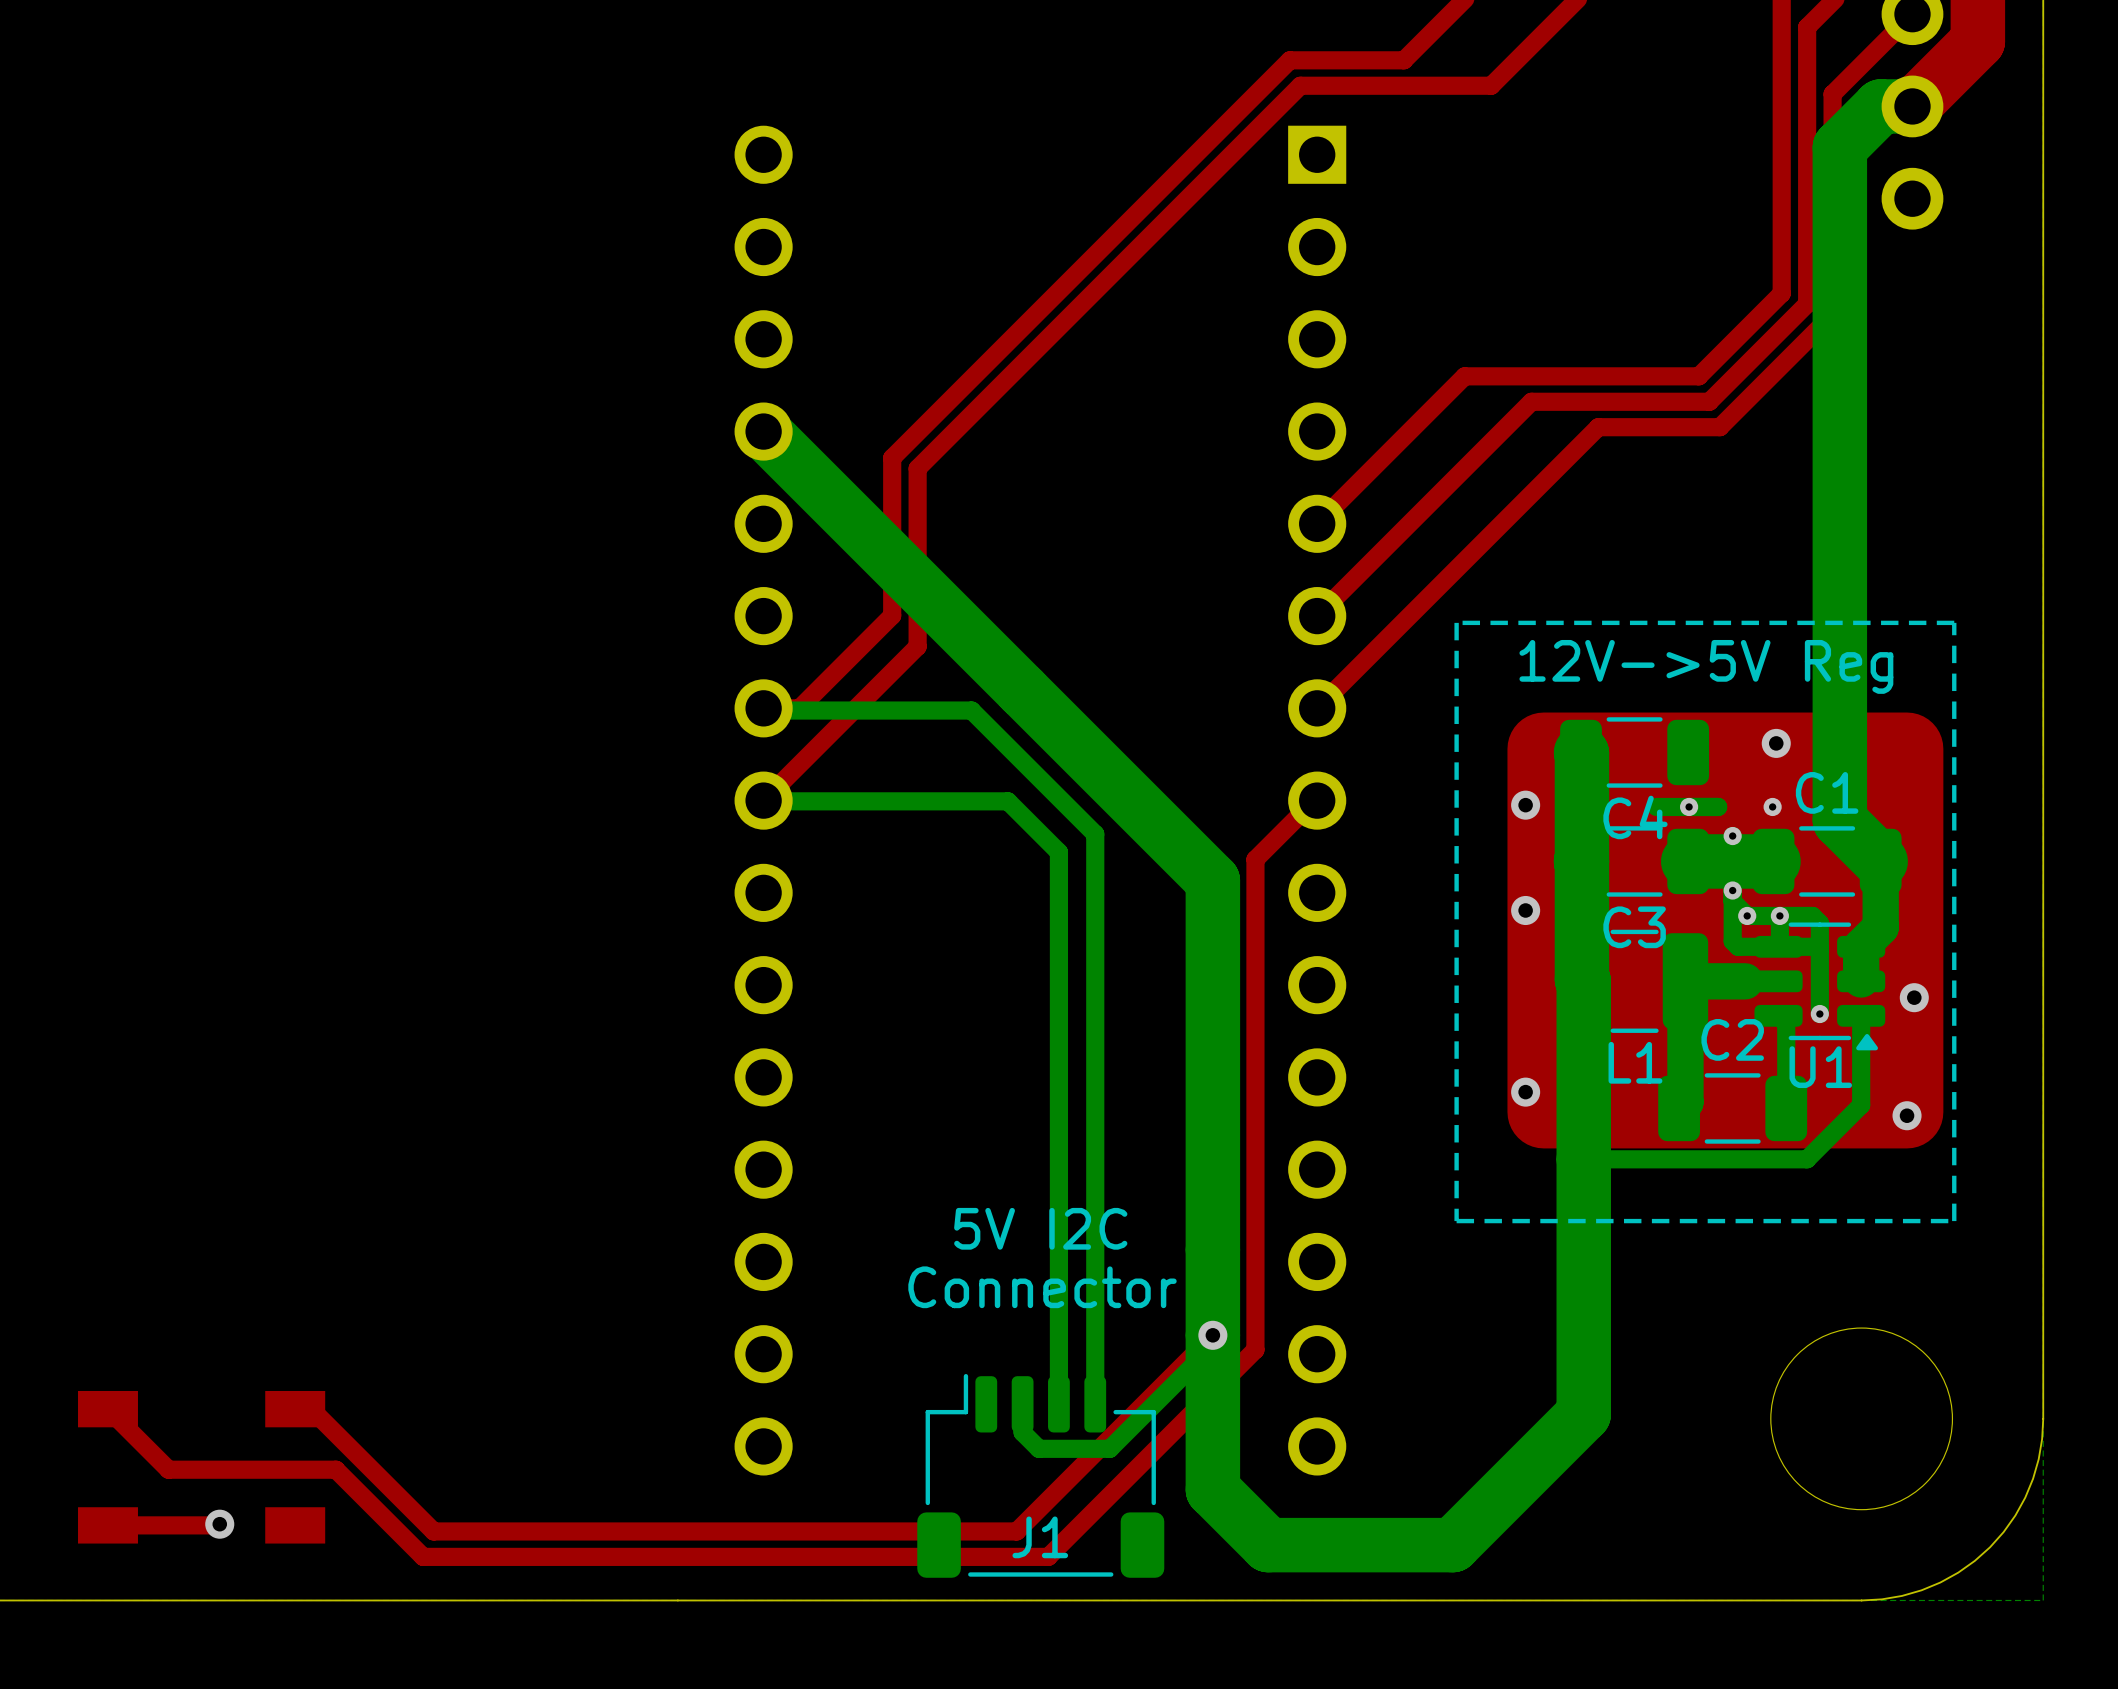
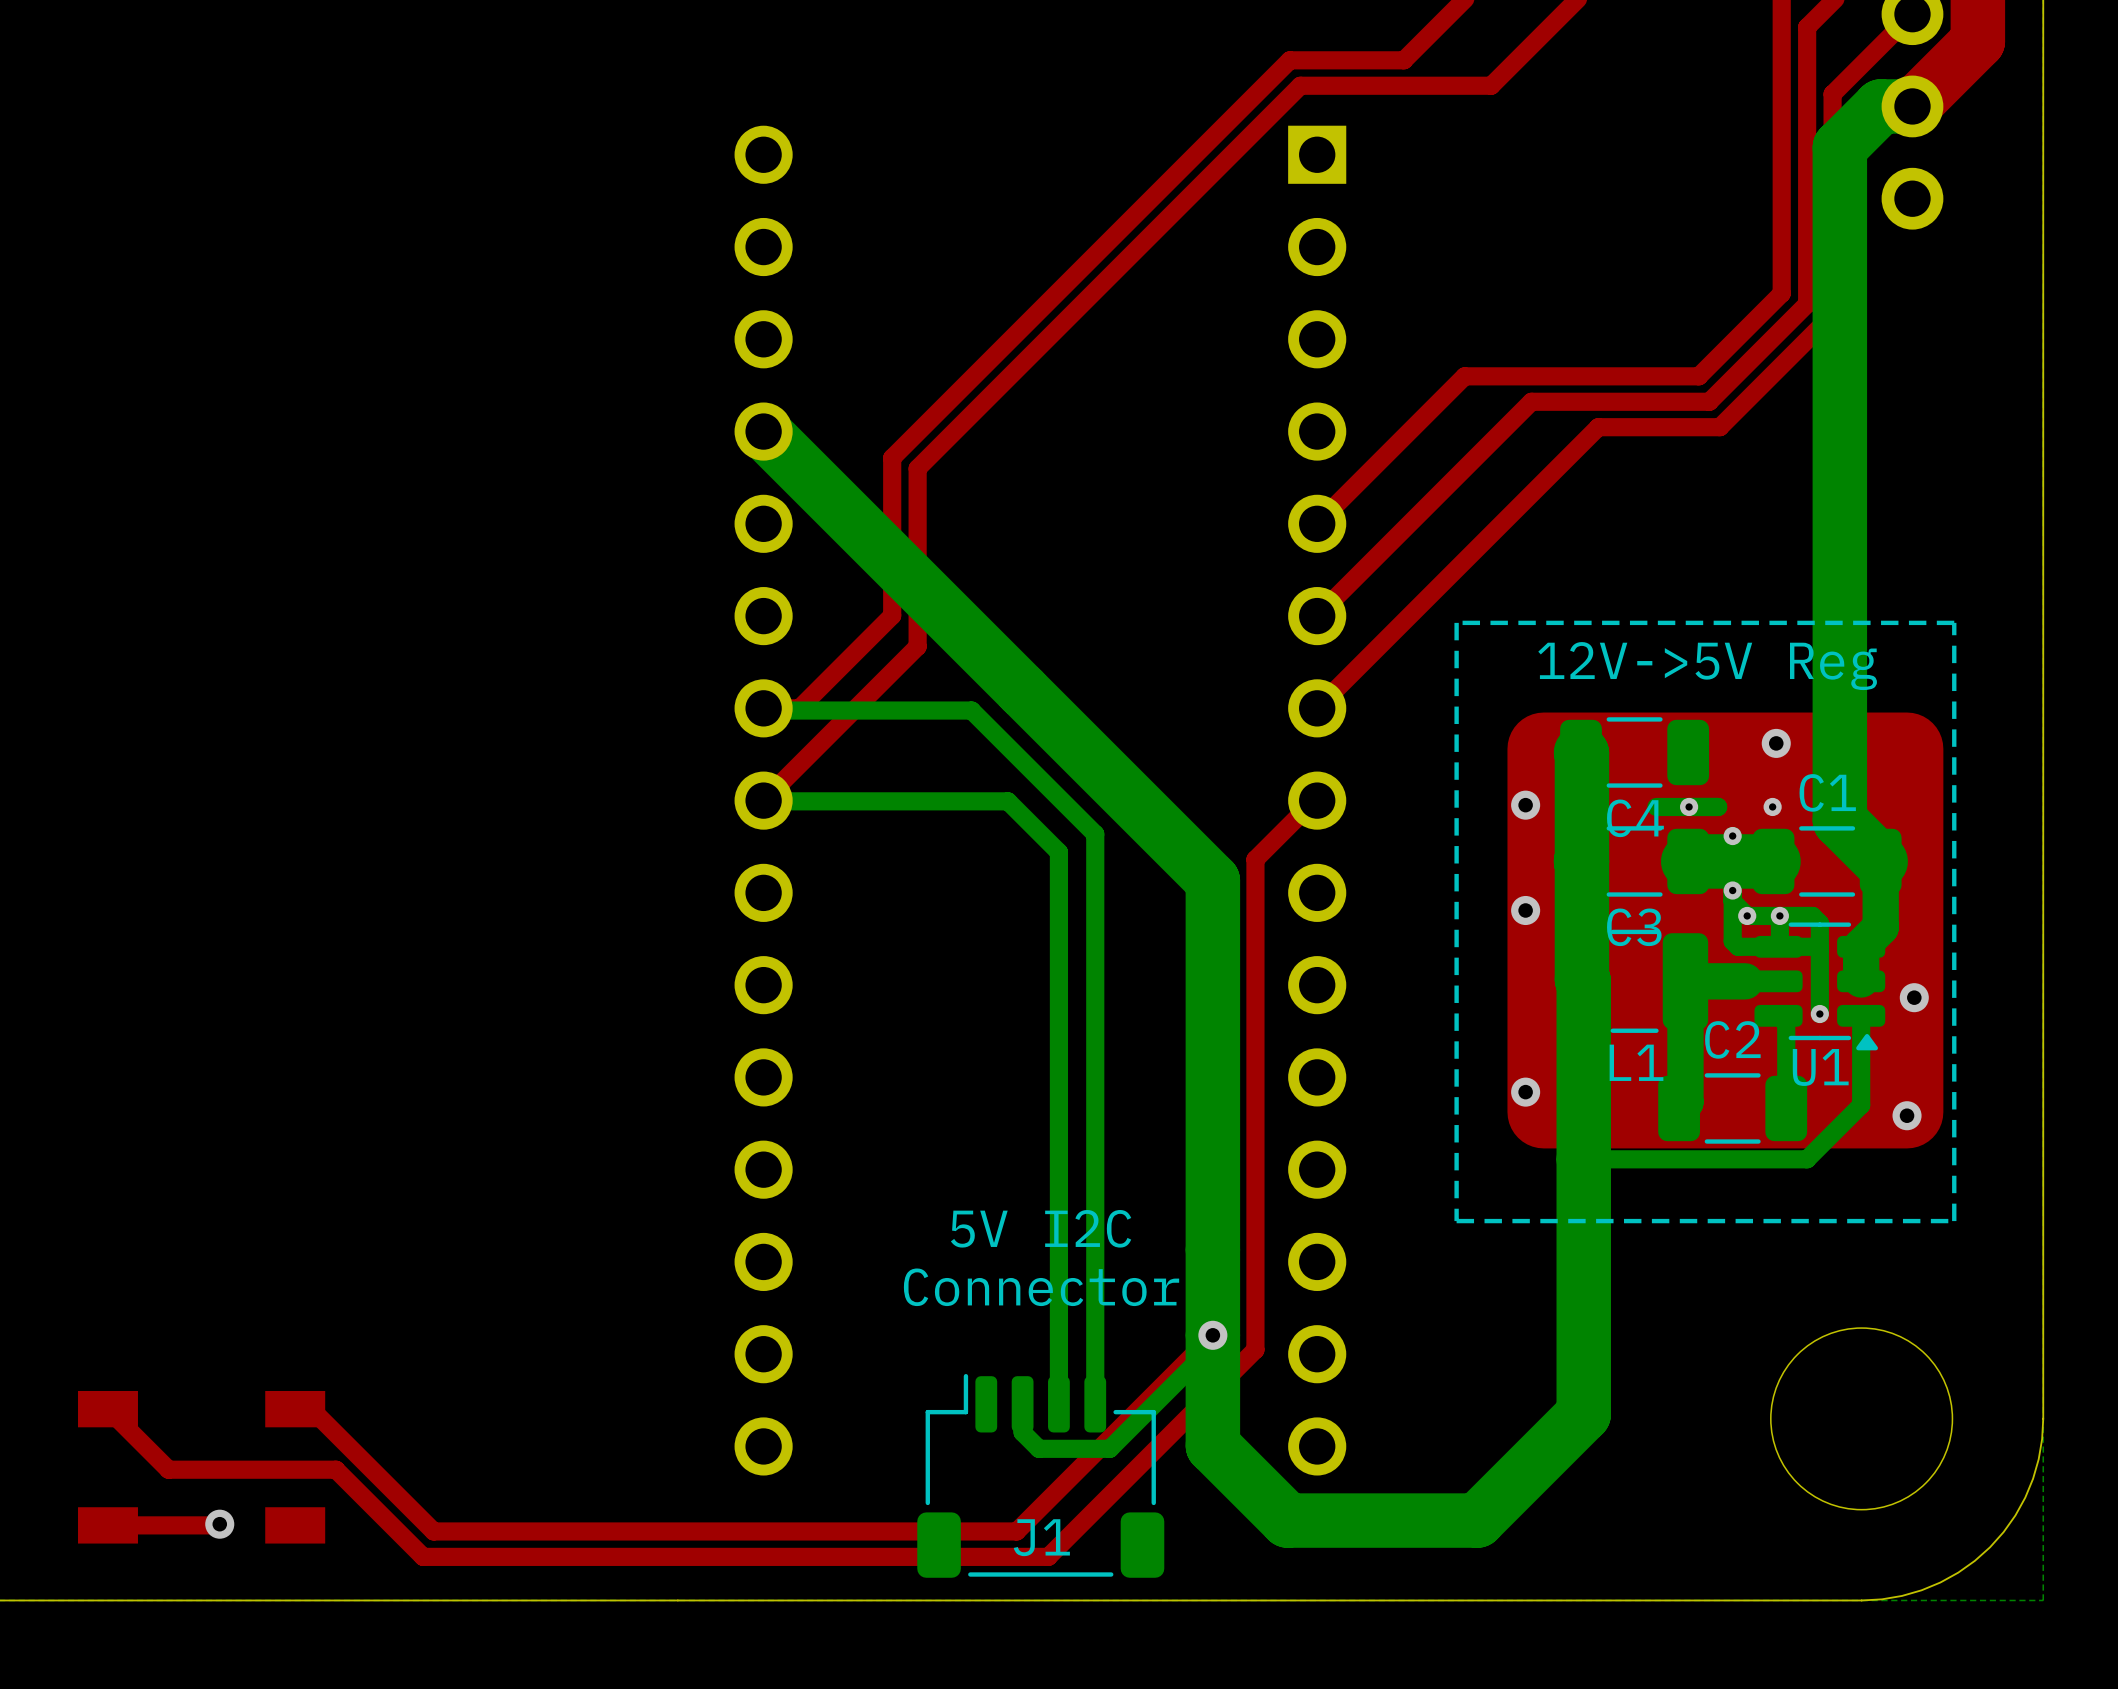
bottom track: (1212, 1445) (1212, 1489) (1268, 1545) (1452, 1545) (1477, 1520) -> (1212, 1445) (1287, 1520) (1477, 1520)

